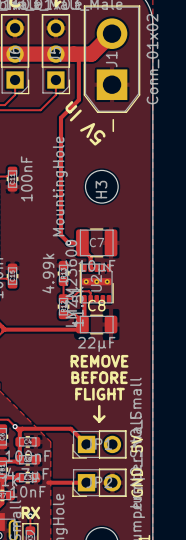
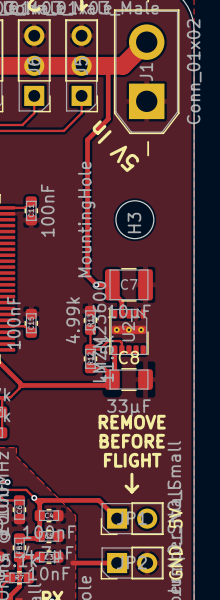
C8 value: 22µF (96, 344) -> 33µF (128, 408)

